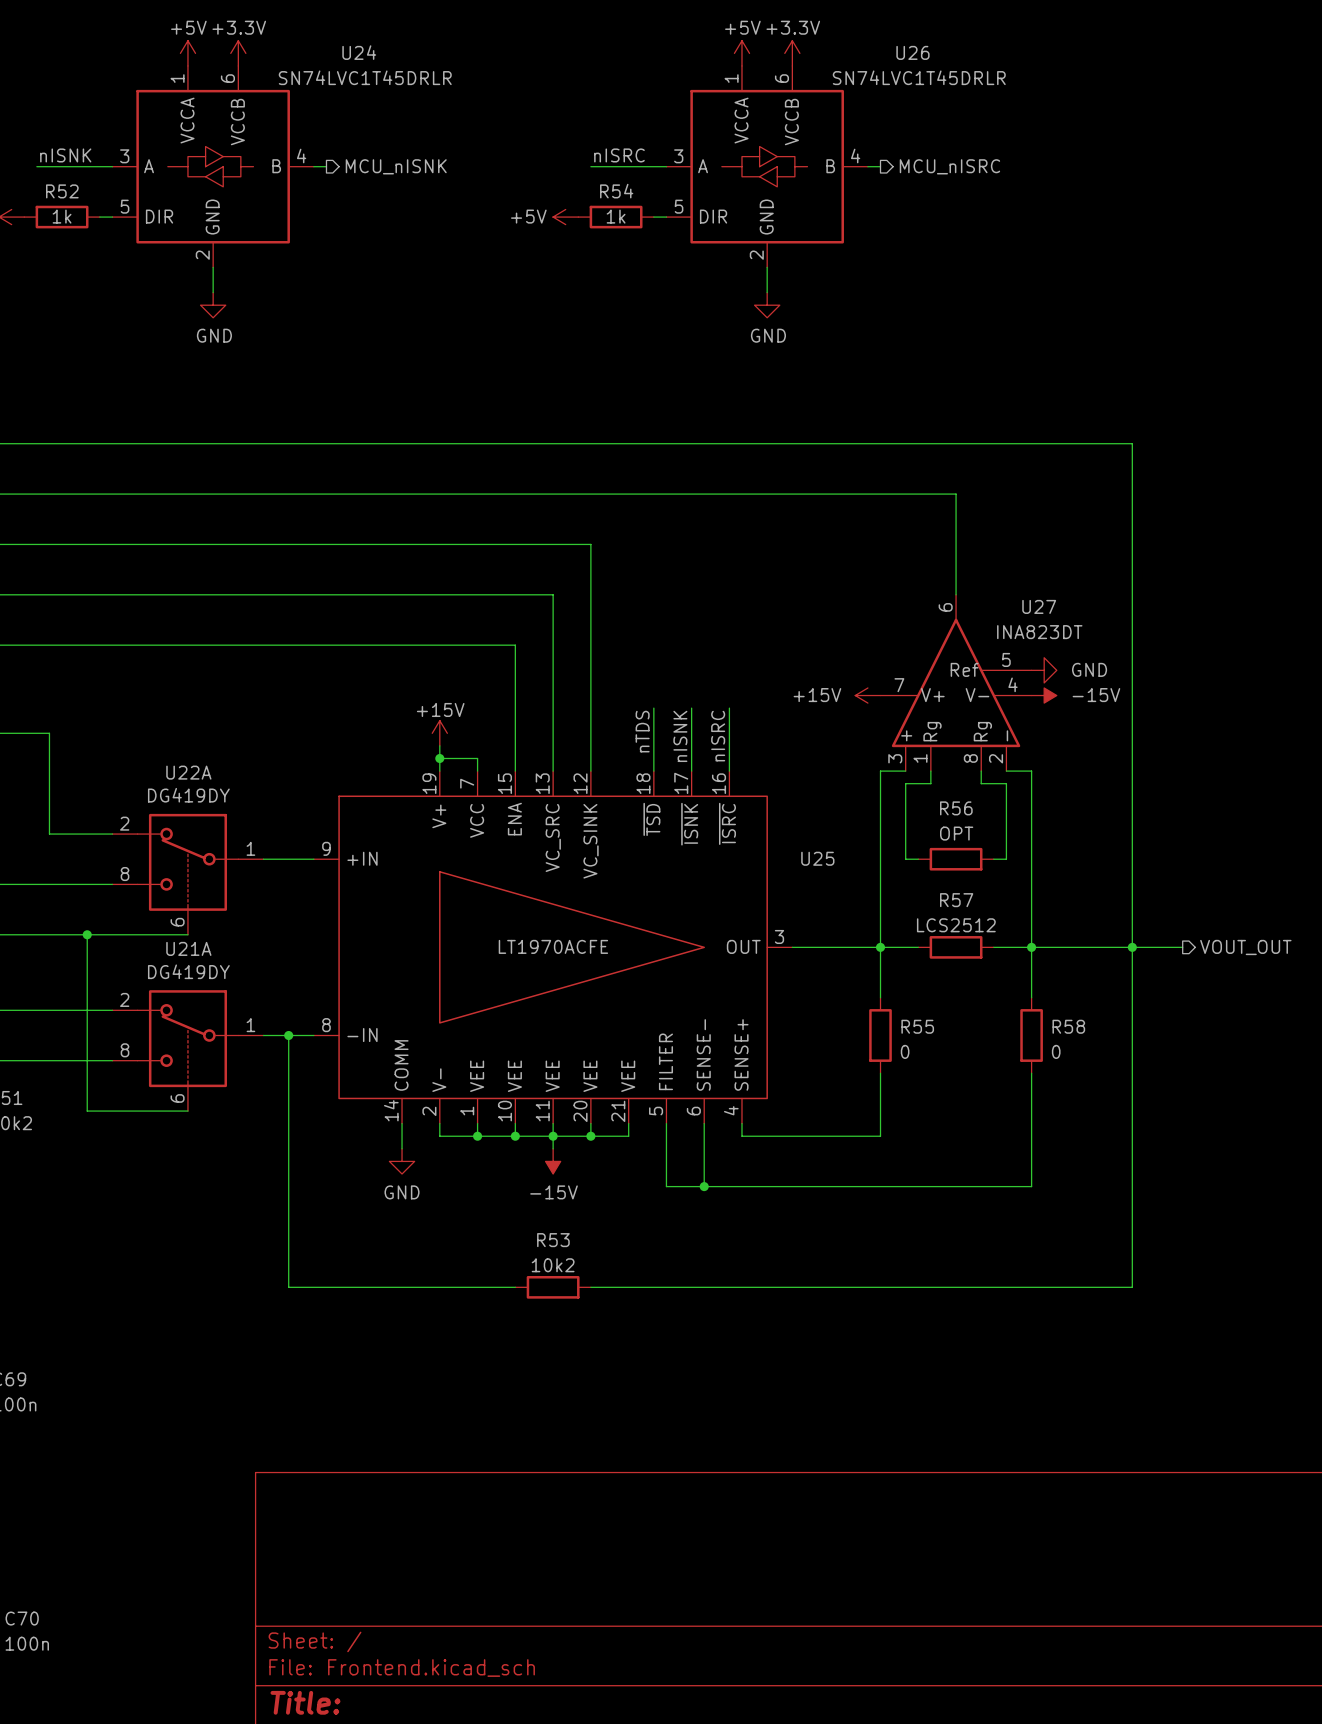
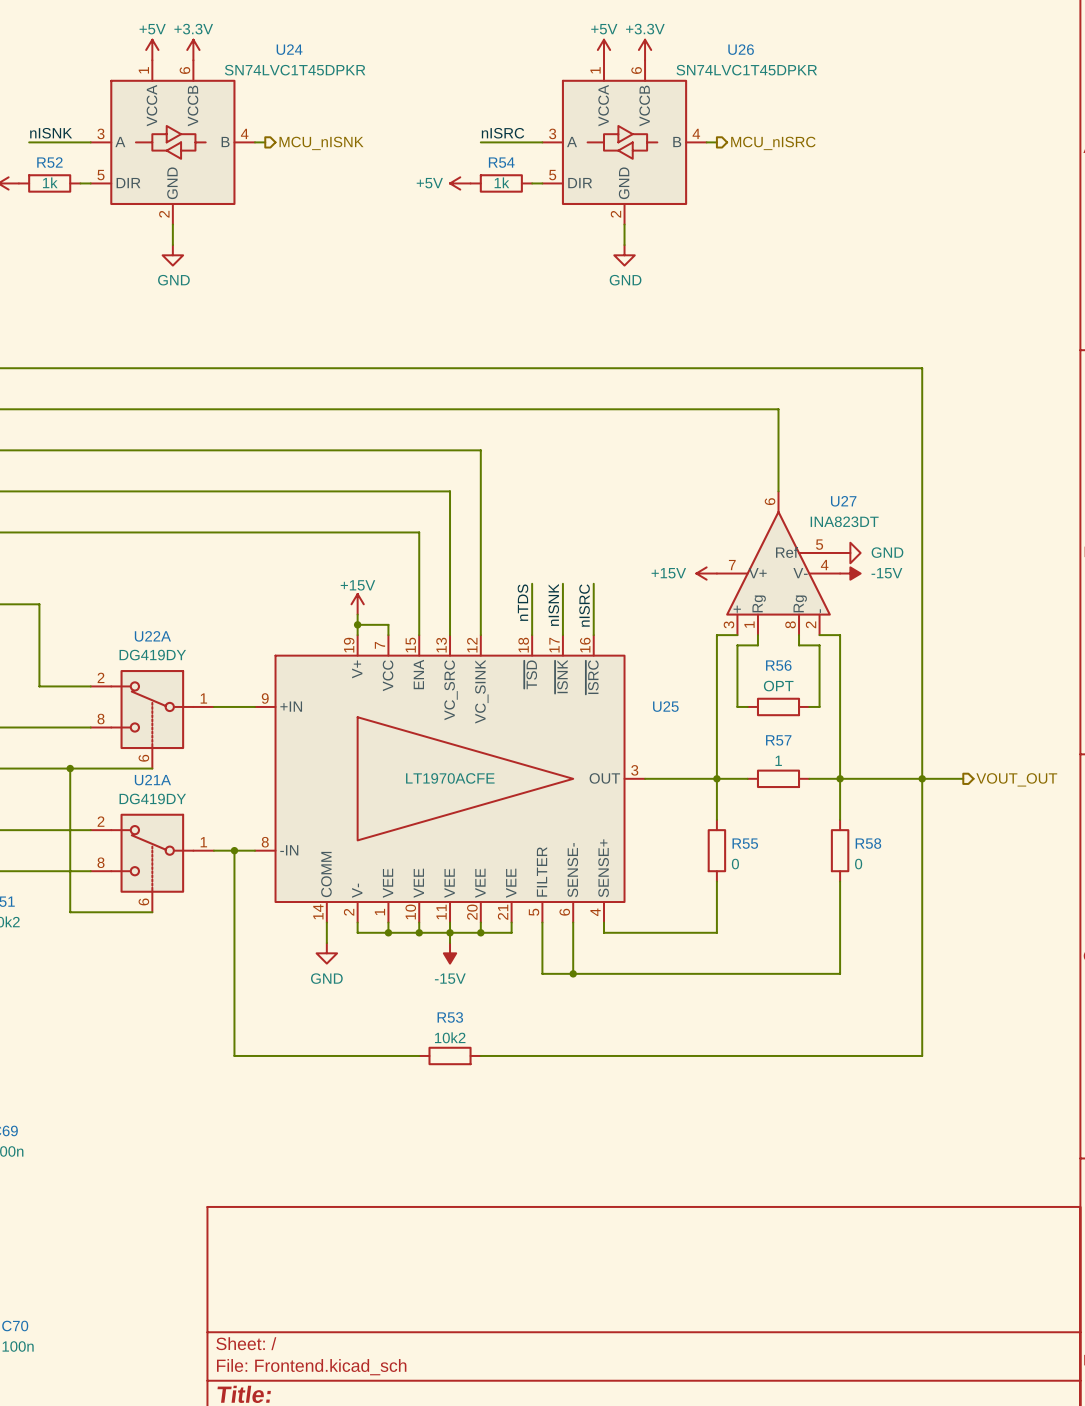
U24 value: SN74LVC1T45DRLR (365, 77) -> SN74LVC1T45DPKR (295, 70)
U26 value: SN74LVC1T45DRLR (919, 77) -> SN74LVC1T45DPKR (746, 70)
R57 value: LCS2512 (956, 925) -> 1 (778, 760)

